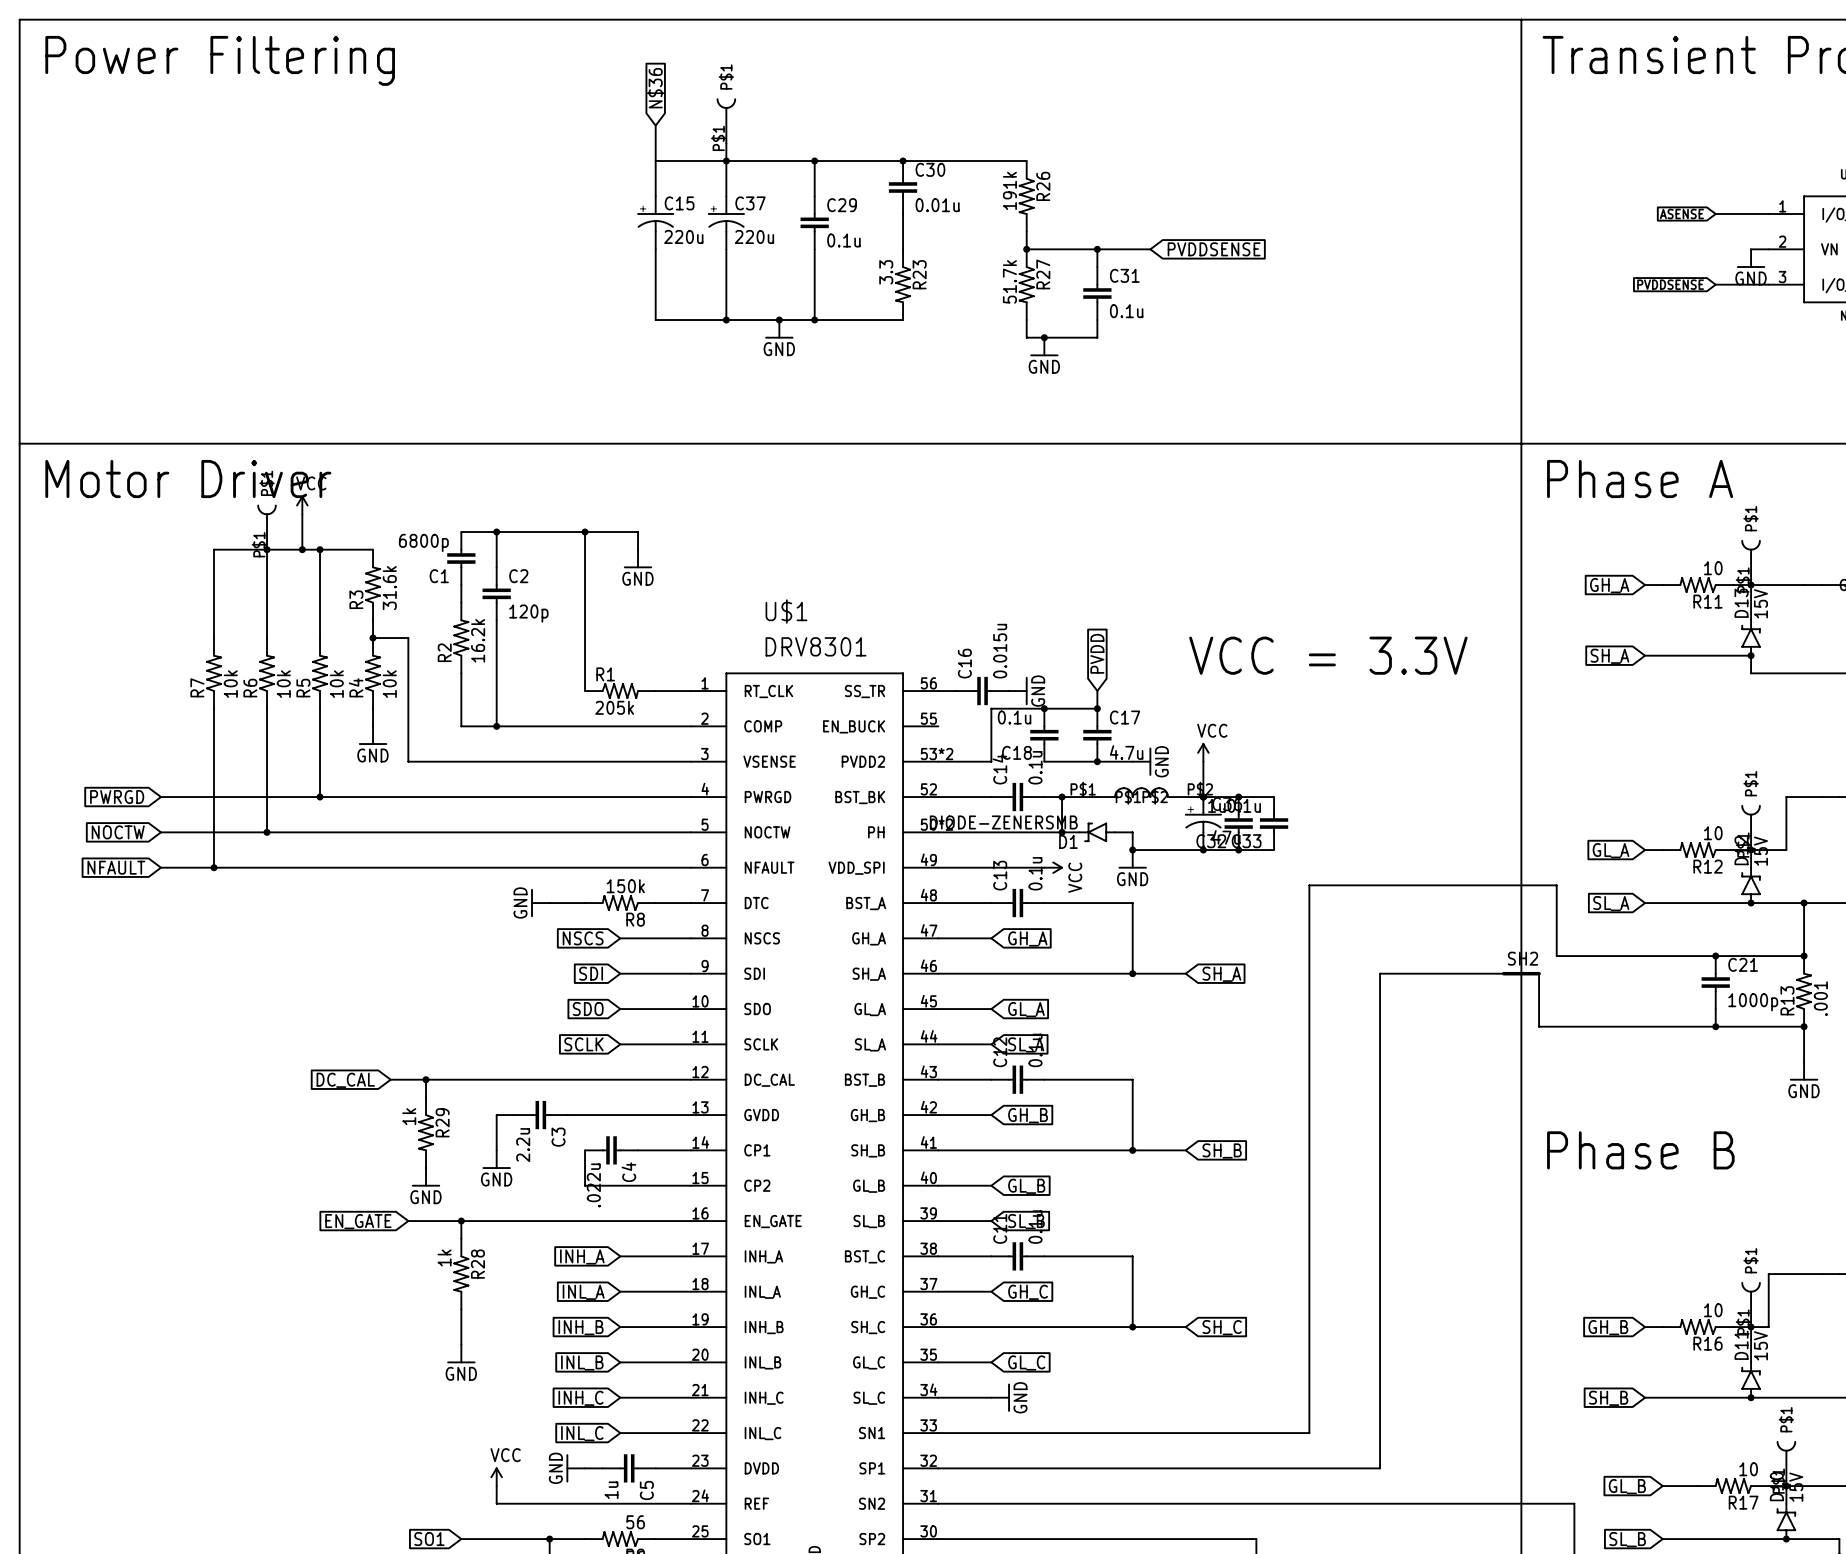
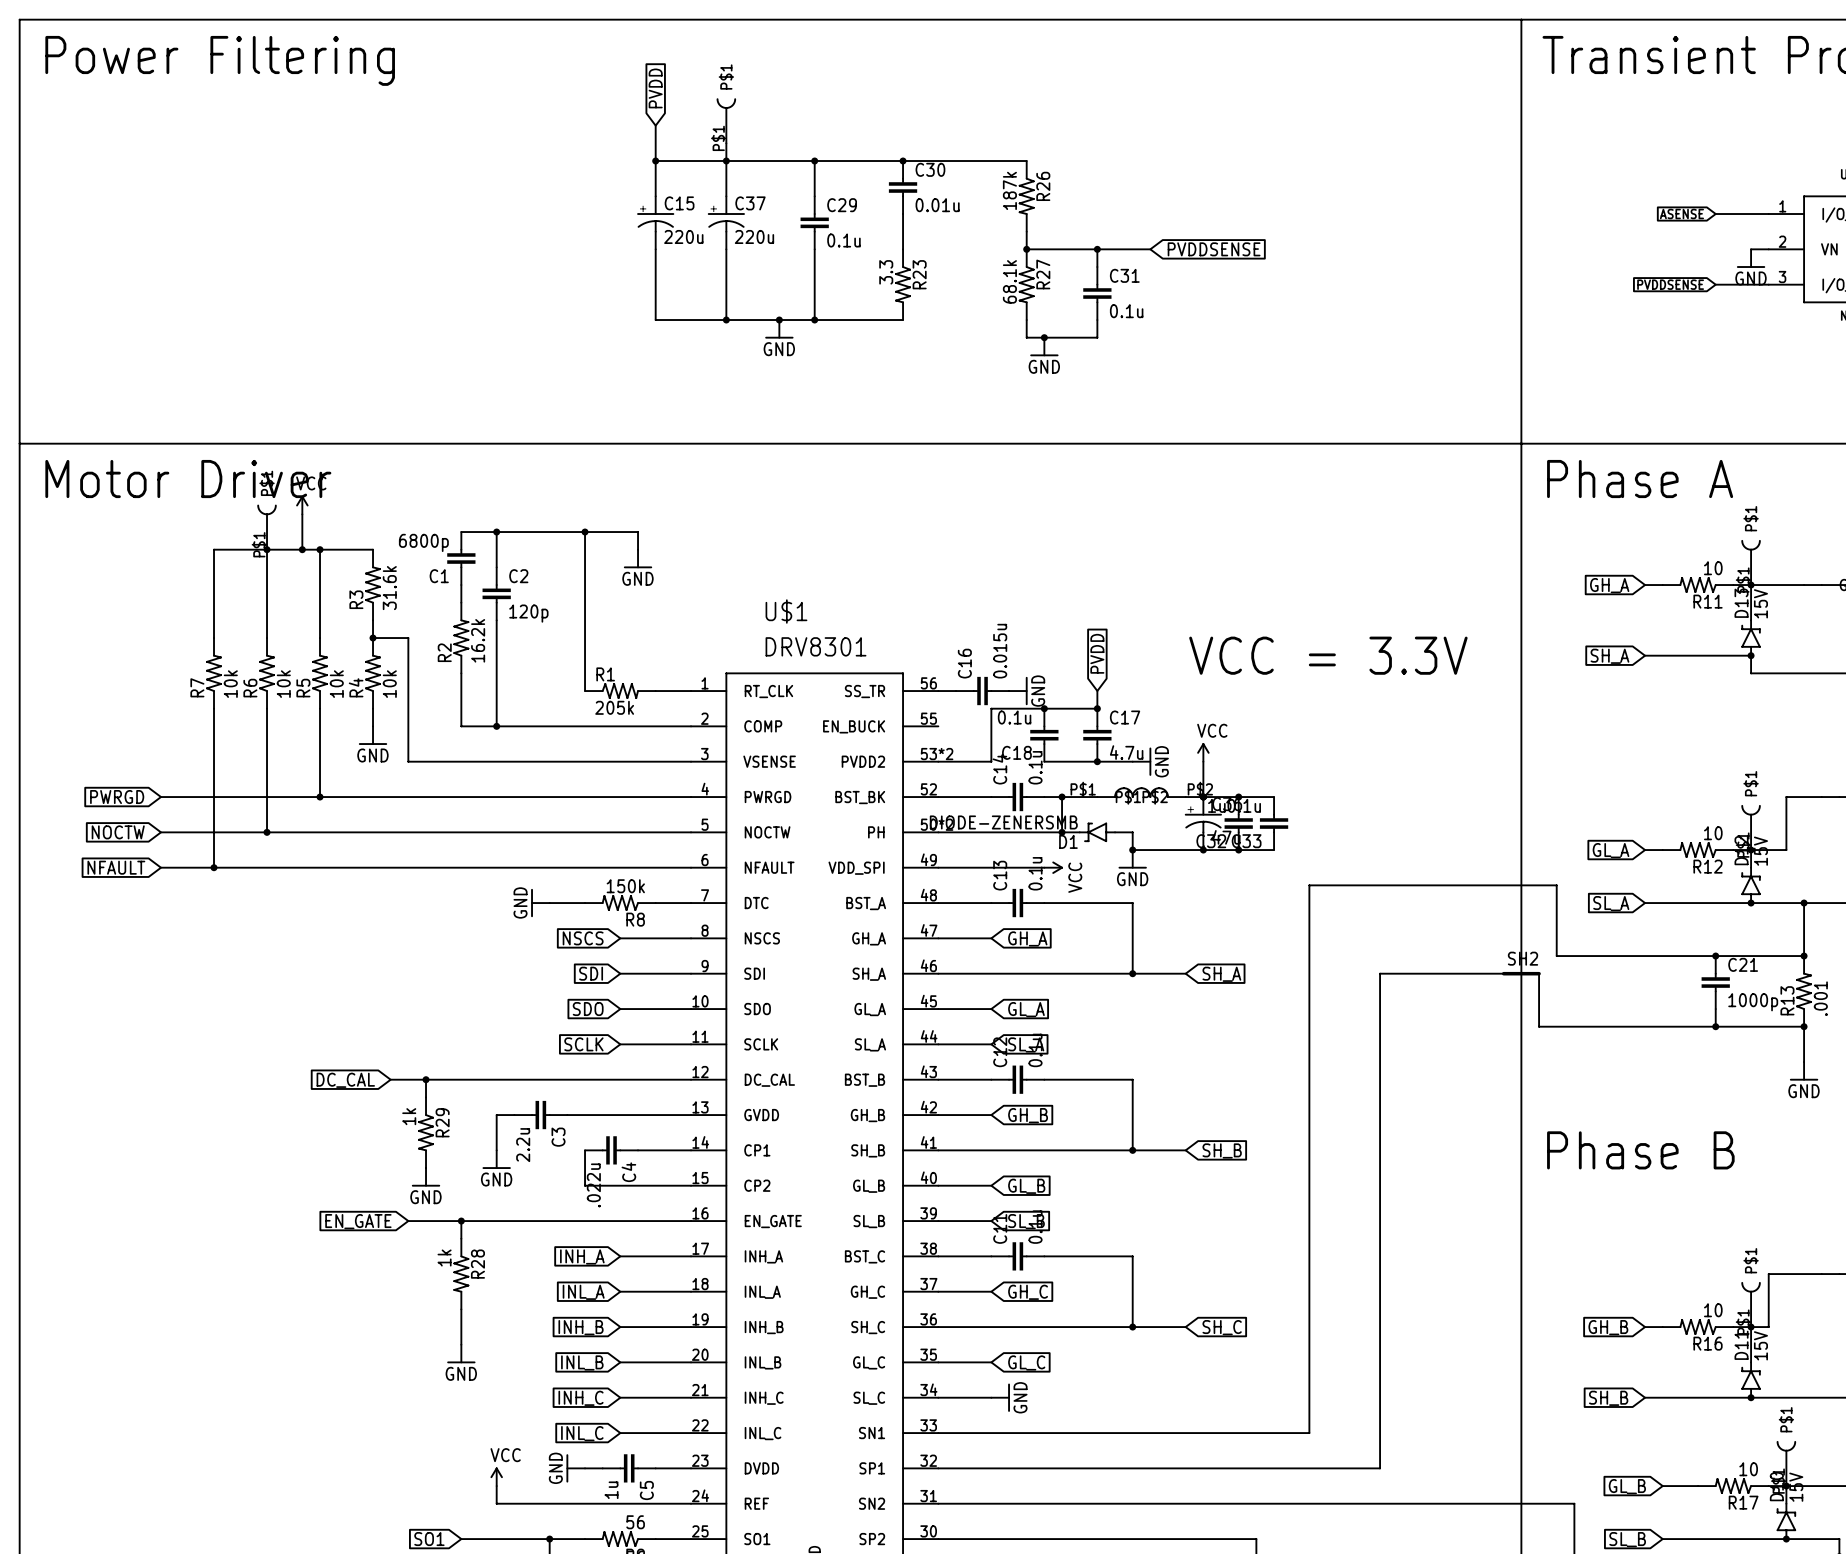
global label: N$36 (655, 88) -> PVDD (655, 88)
junction: none -> (655, 161)
R26 value: 191k (1009, 190) -> 187k (1009, 190)
R27 value: 51.7k (1009, 281) -> 68.1k (1009, 281)

